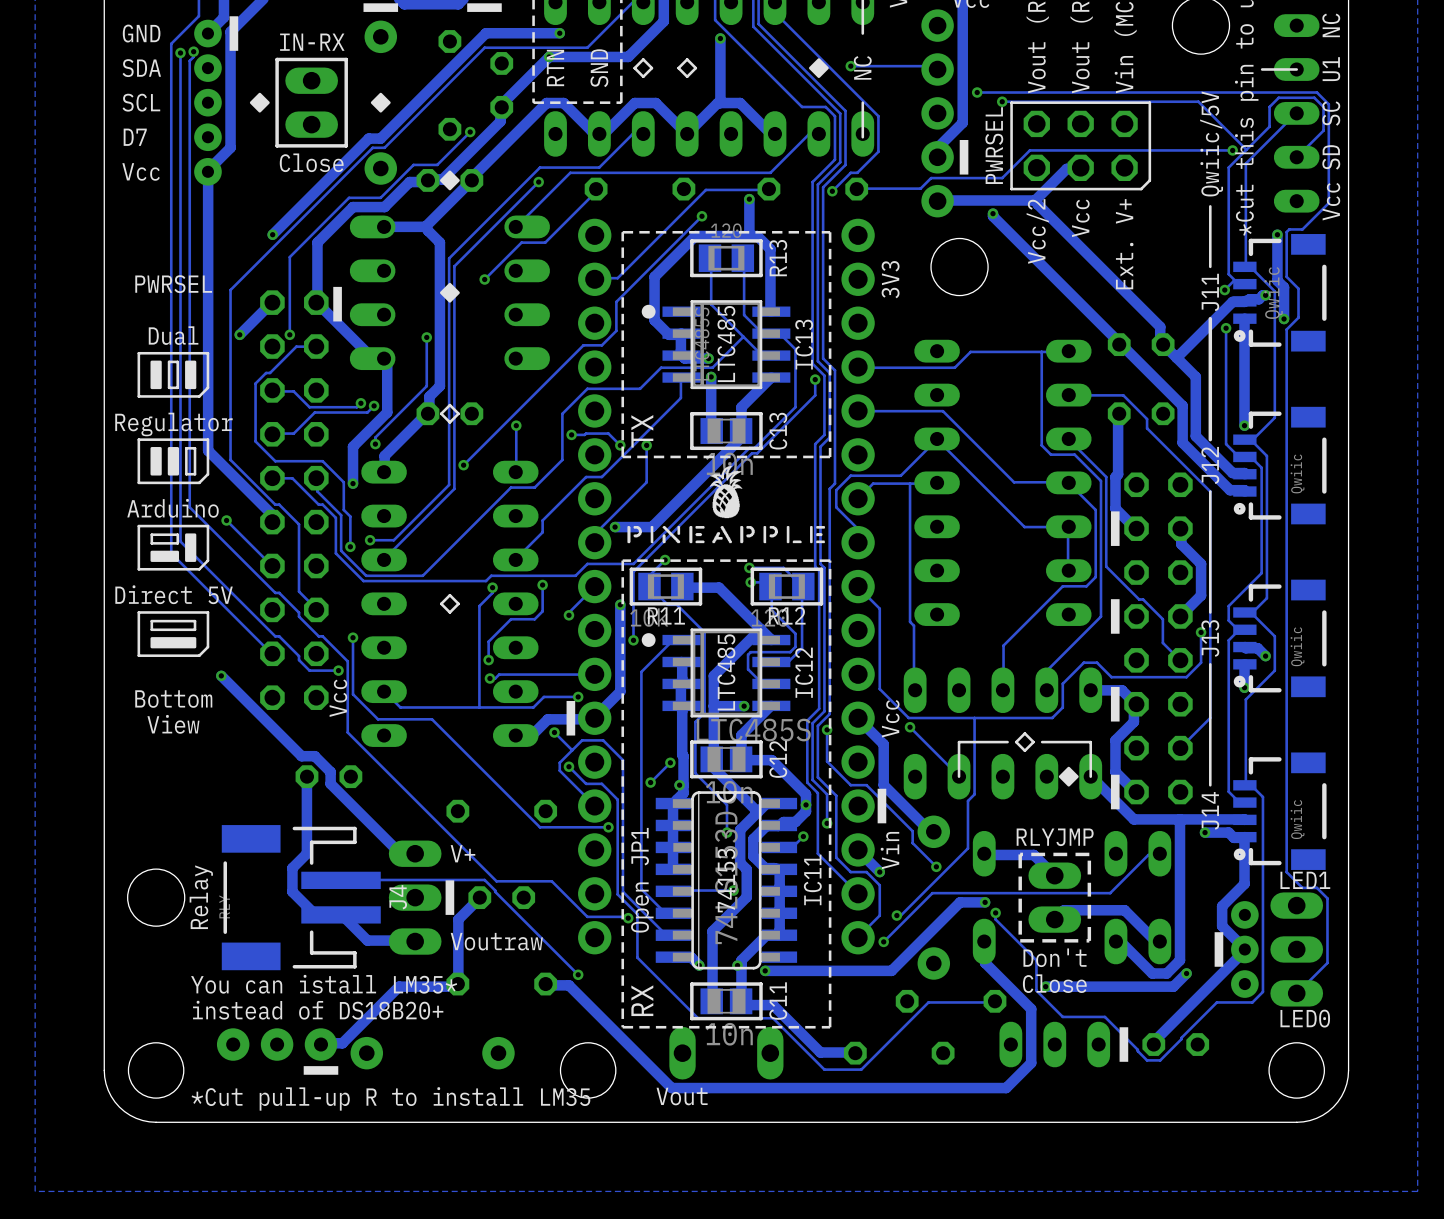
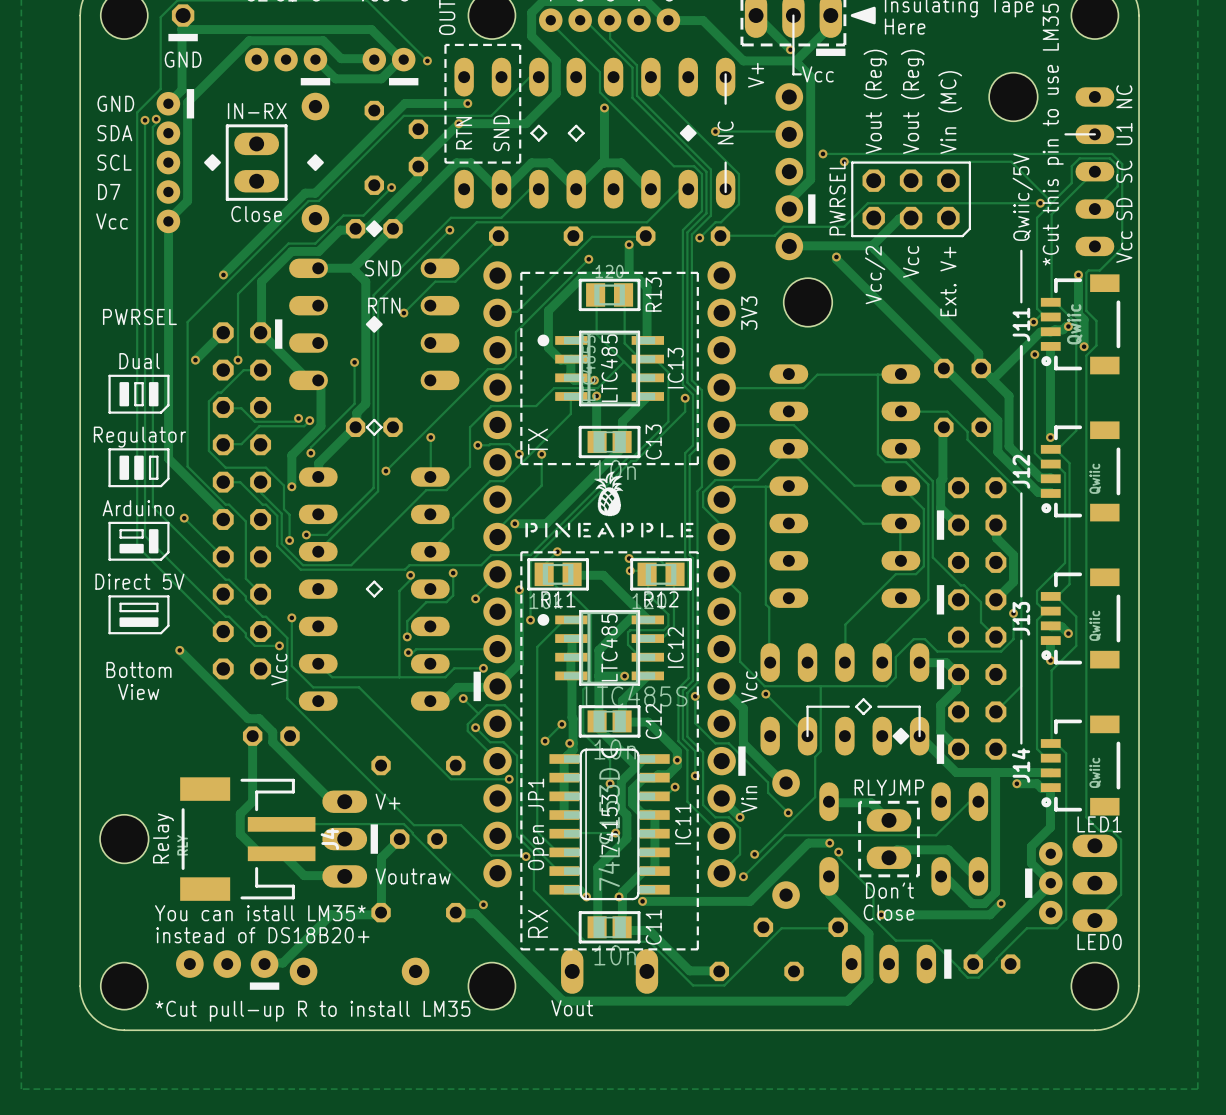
text: none -> SND (383, 268)
text: none -> RTN (384, 305)

